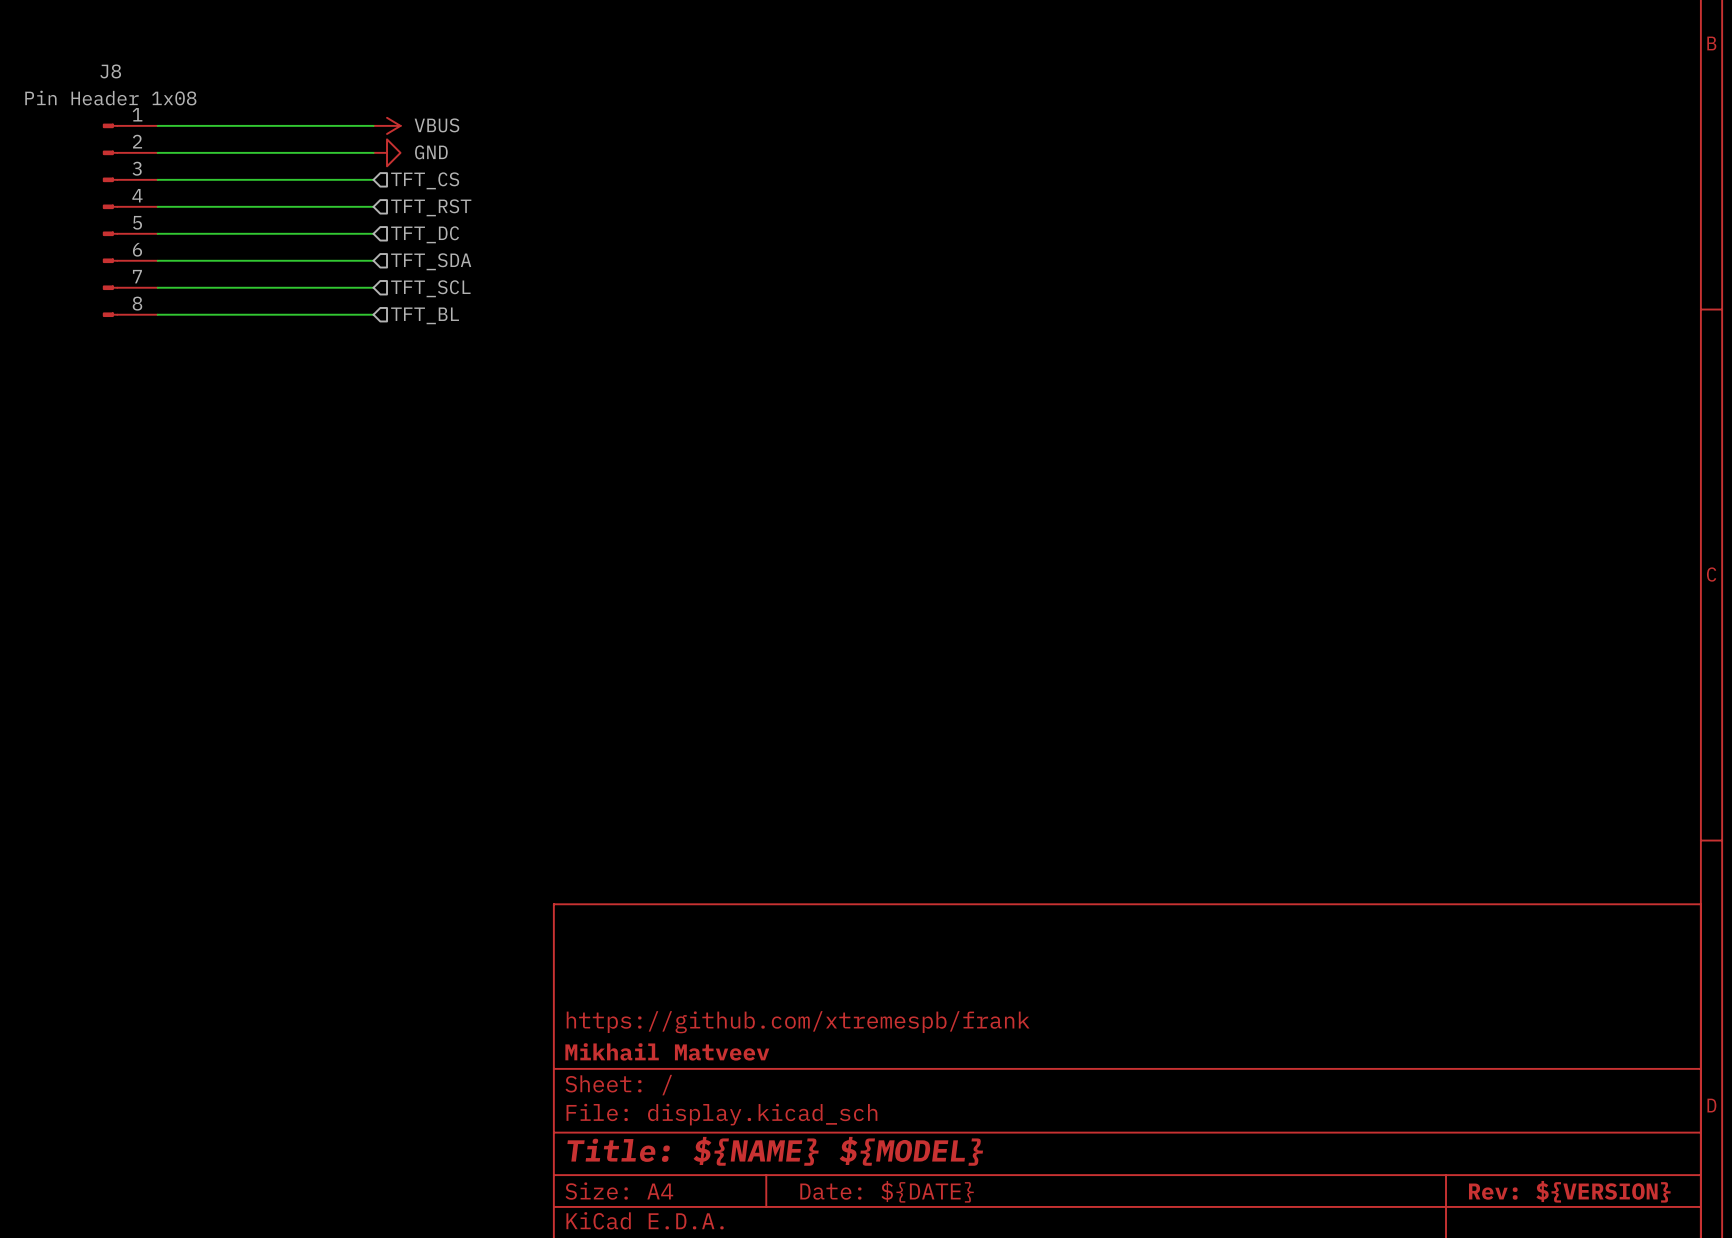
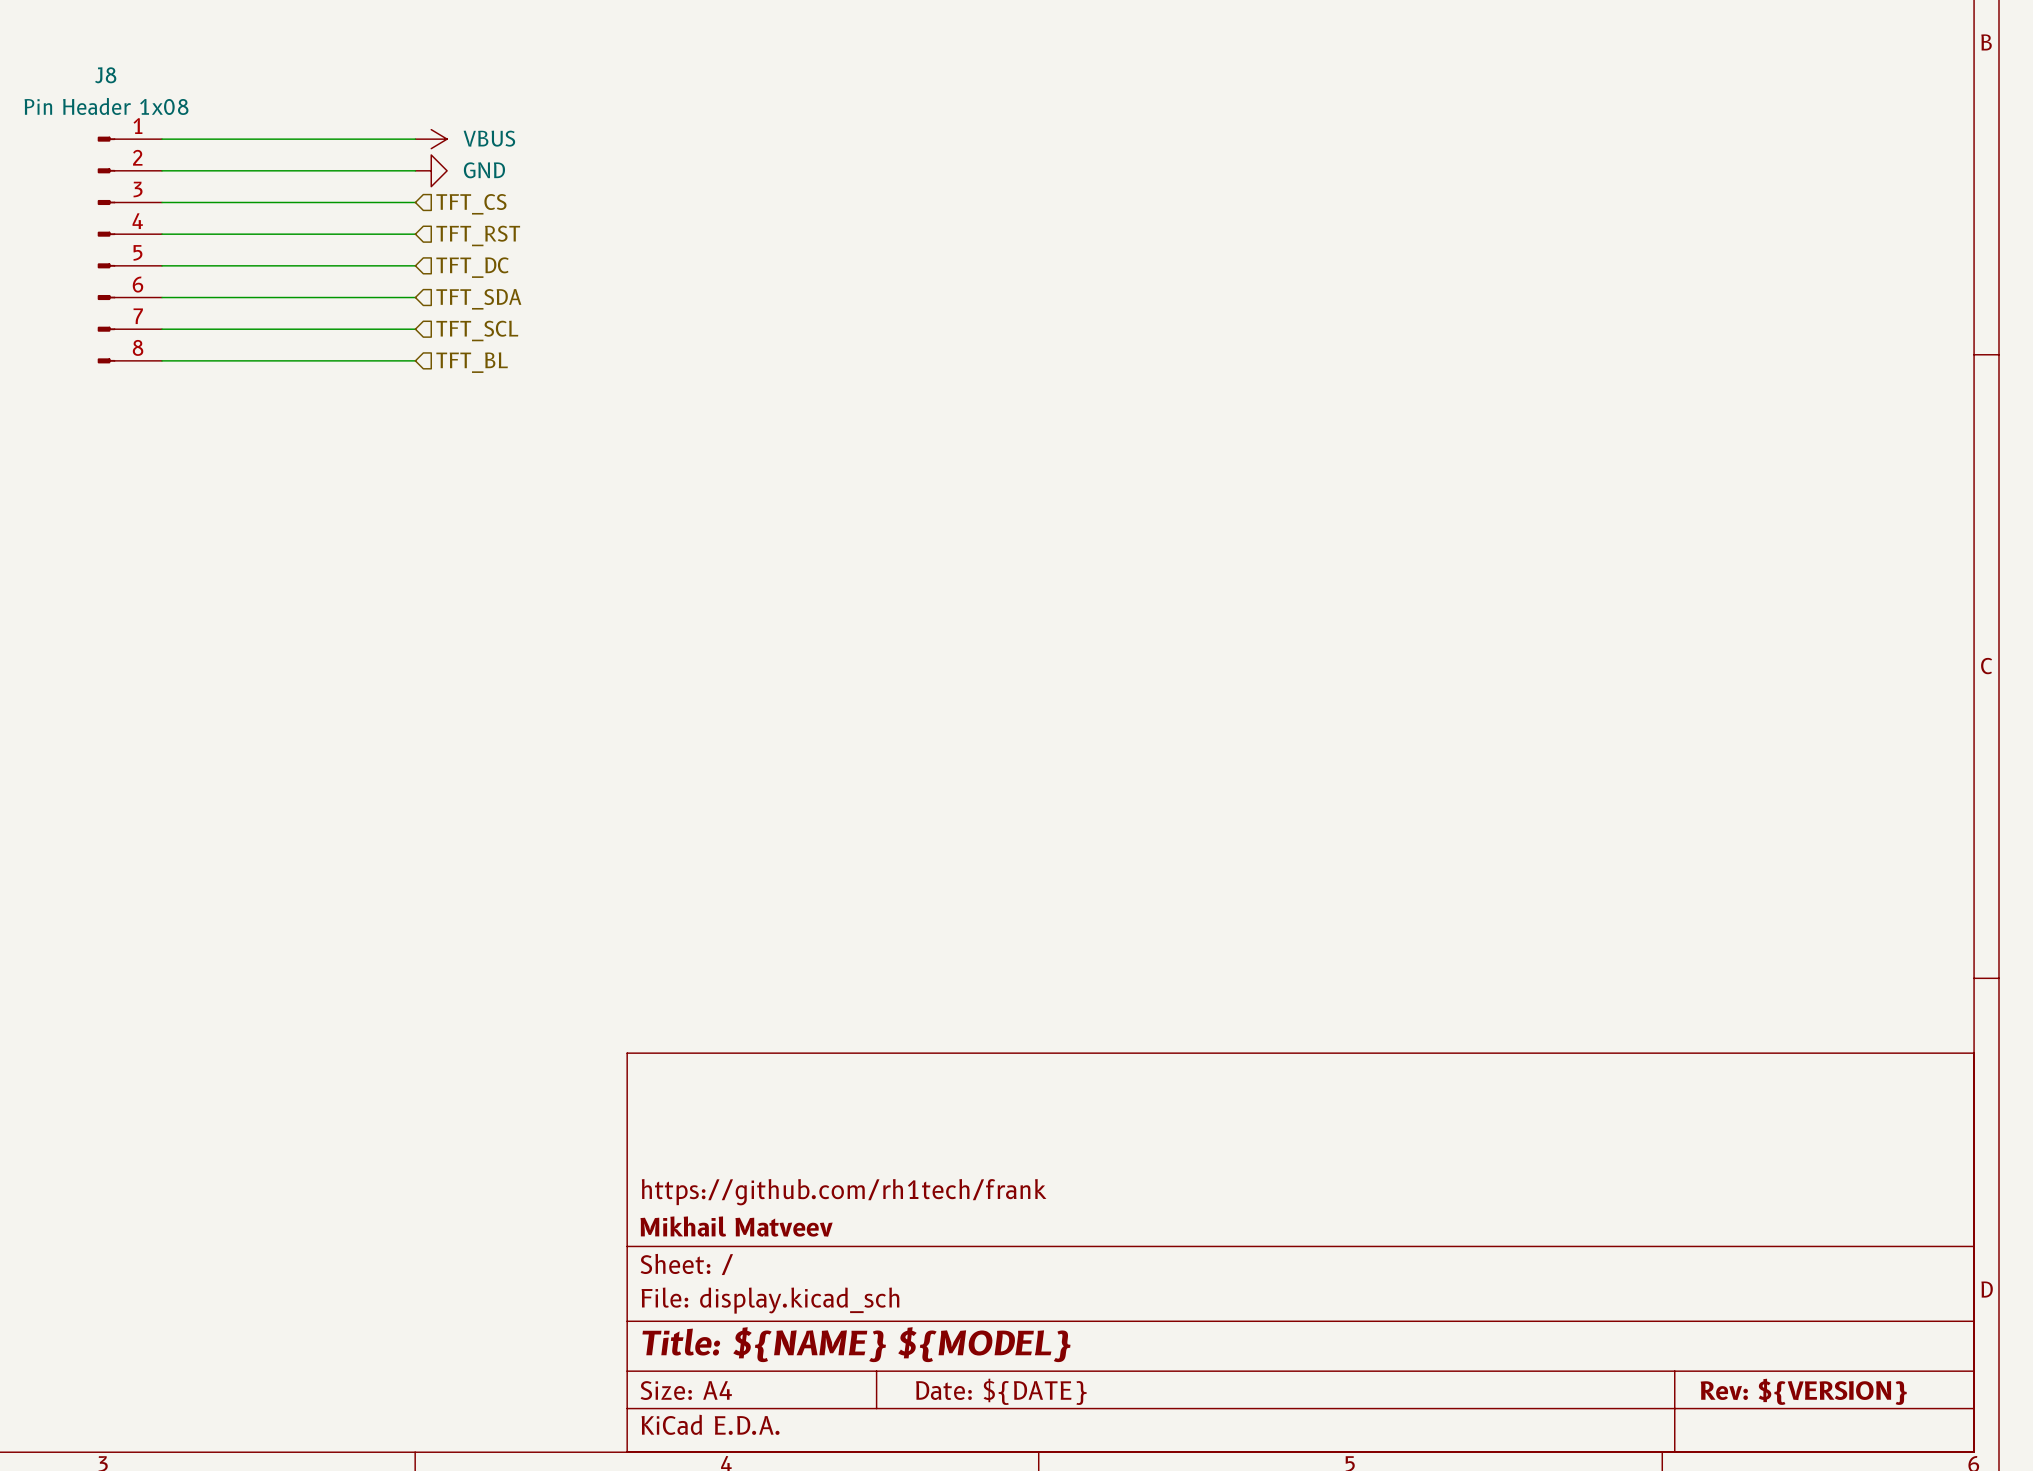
title block: https://github.com/xtremespb/frank (798, 1022) -> https://github.com/rh1tech/frank (844, 1192)

